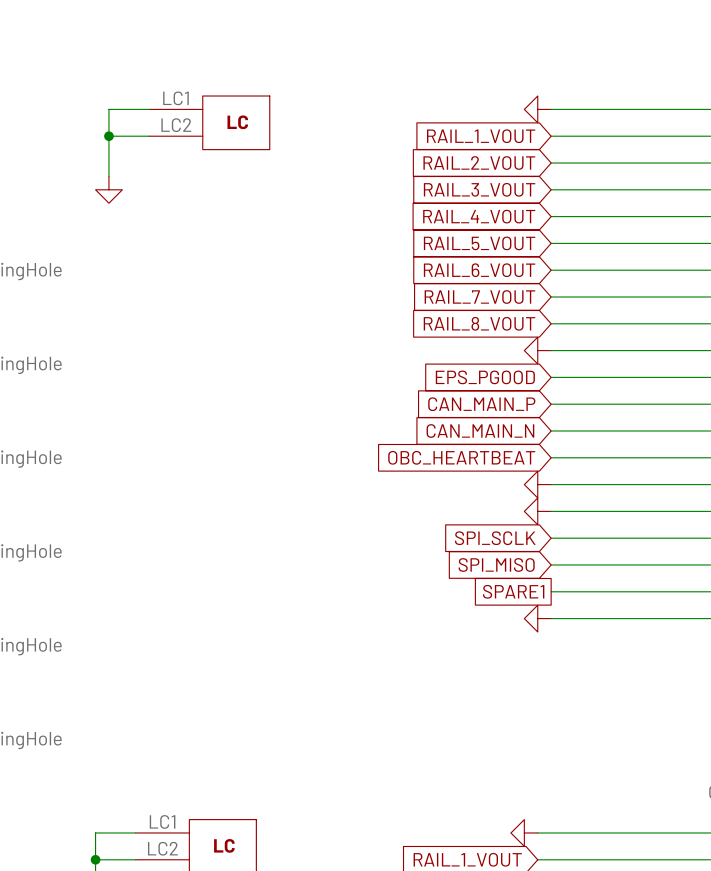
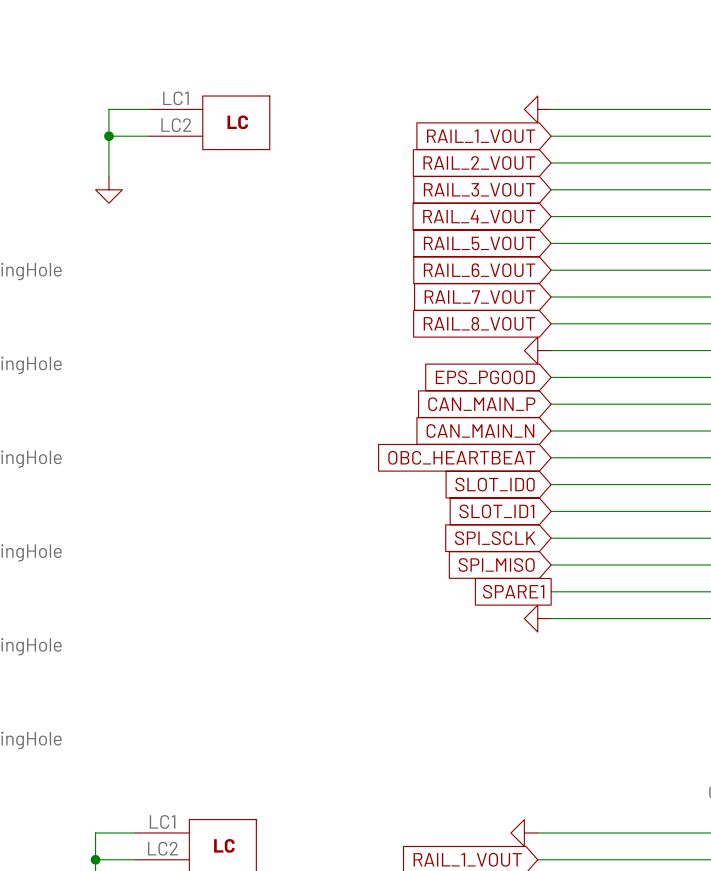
global label: none -> SLOT_ID0 (495, 484)
power symbol: (537, 484) -> none
global label: none -> SLOT_ID1 (496, 511)
power symbol: (537, 511) -> none

